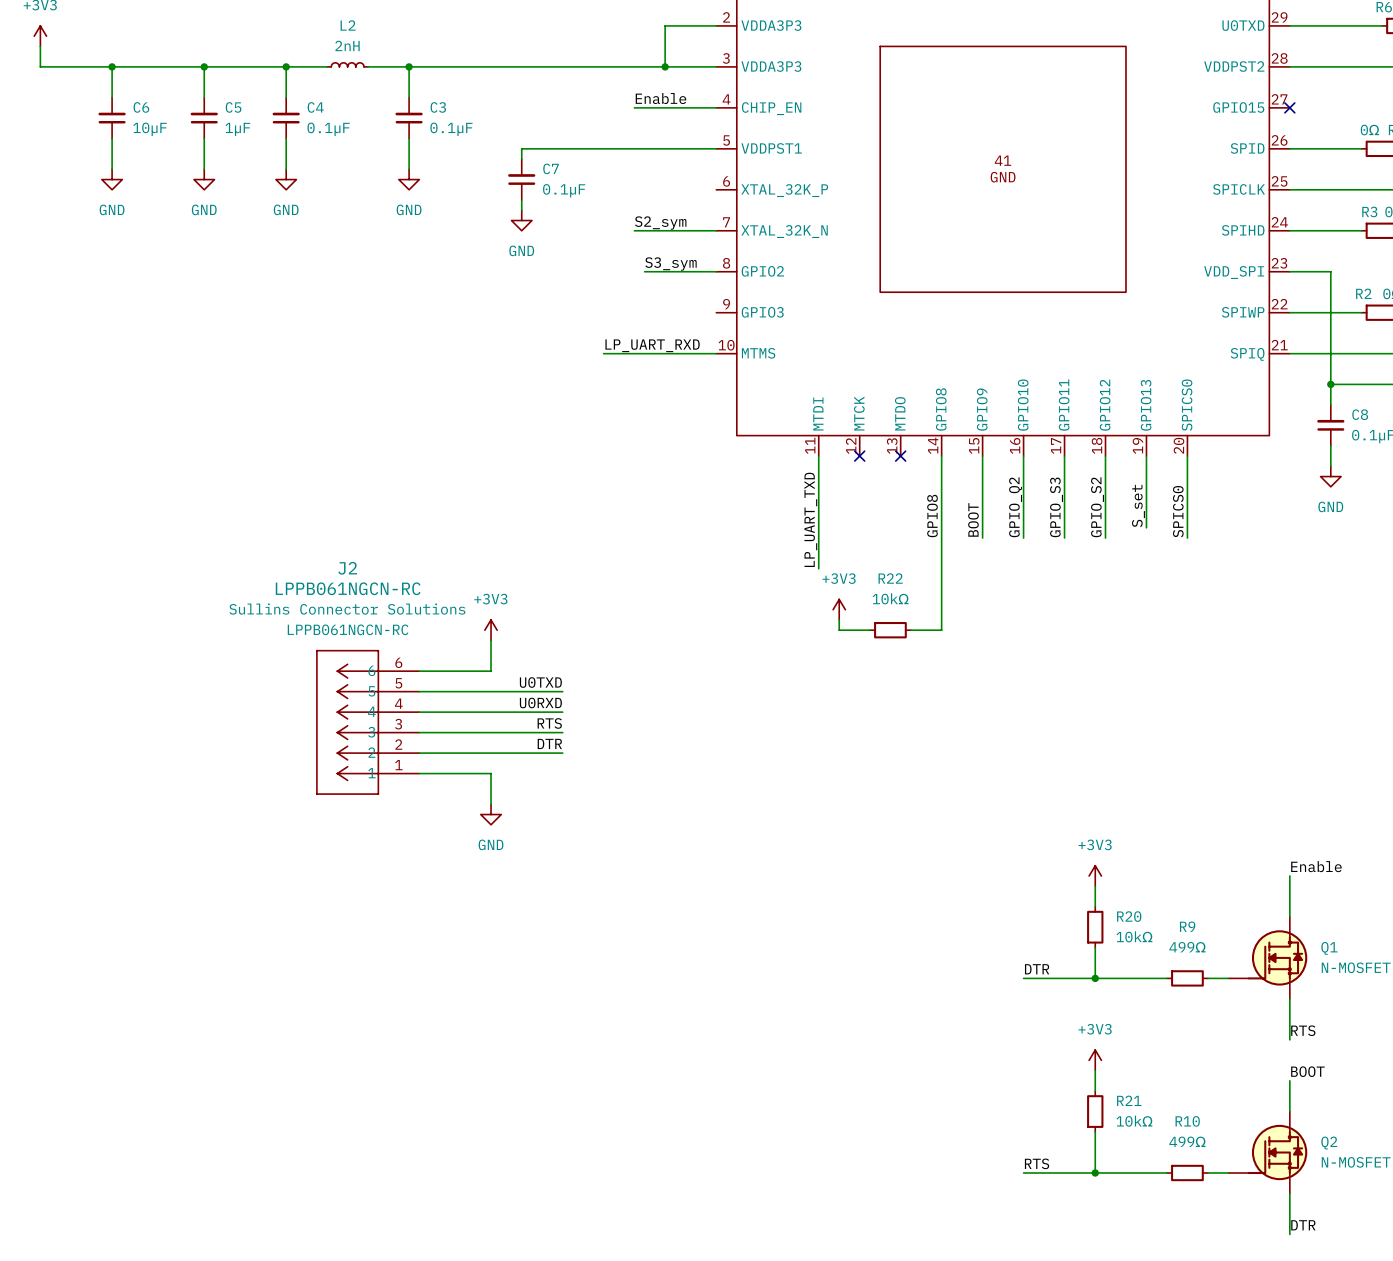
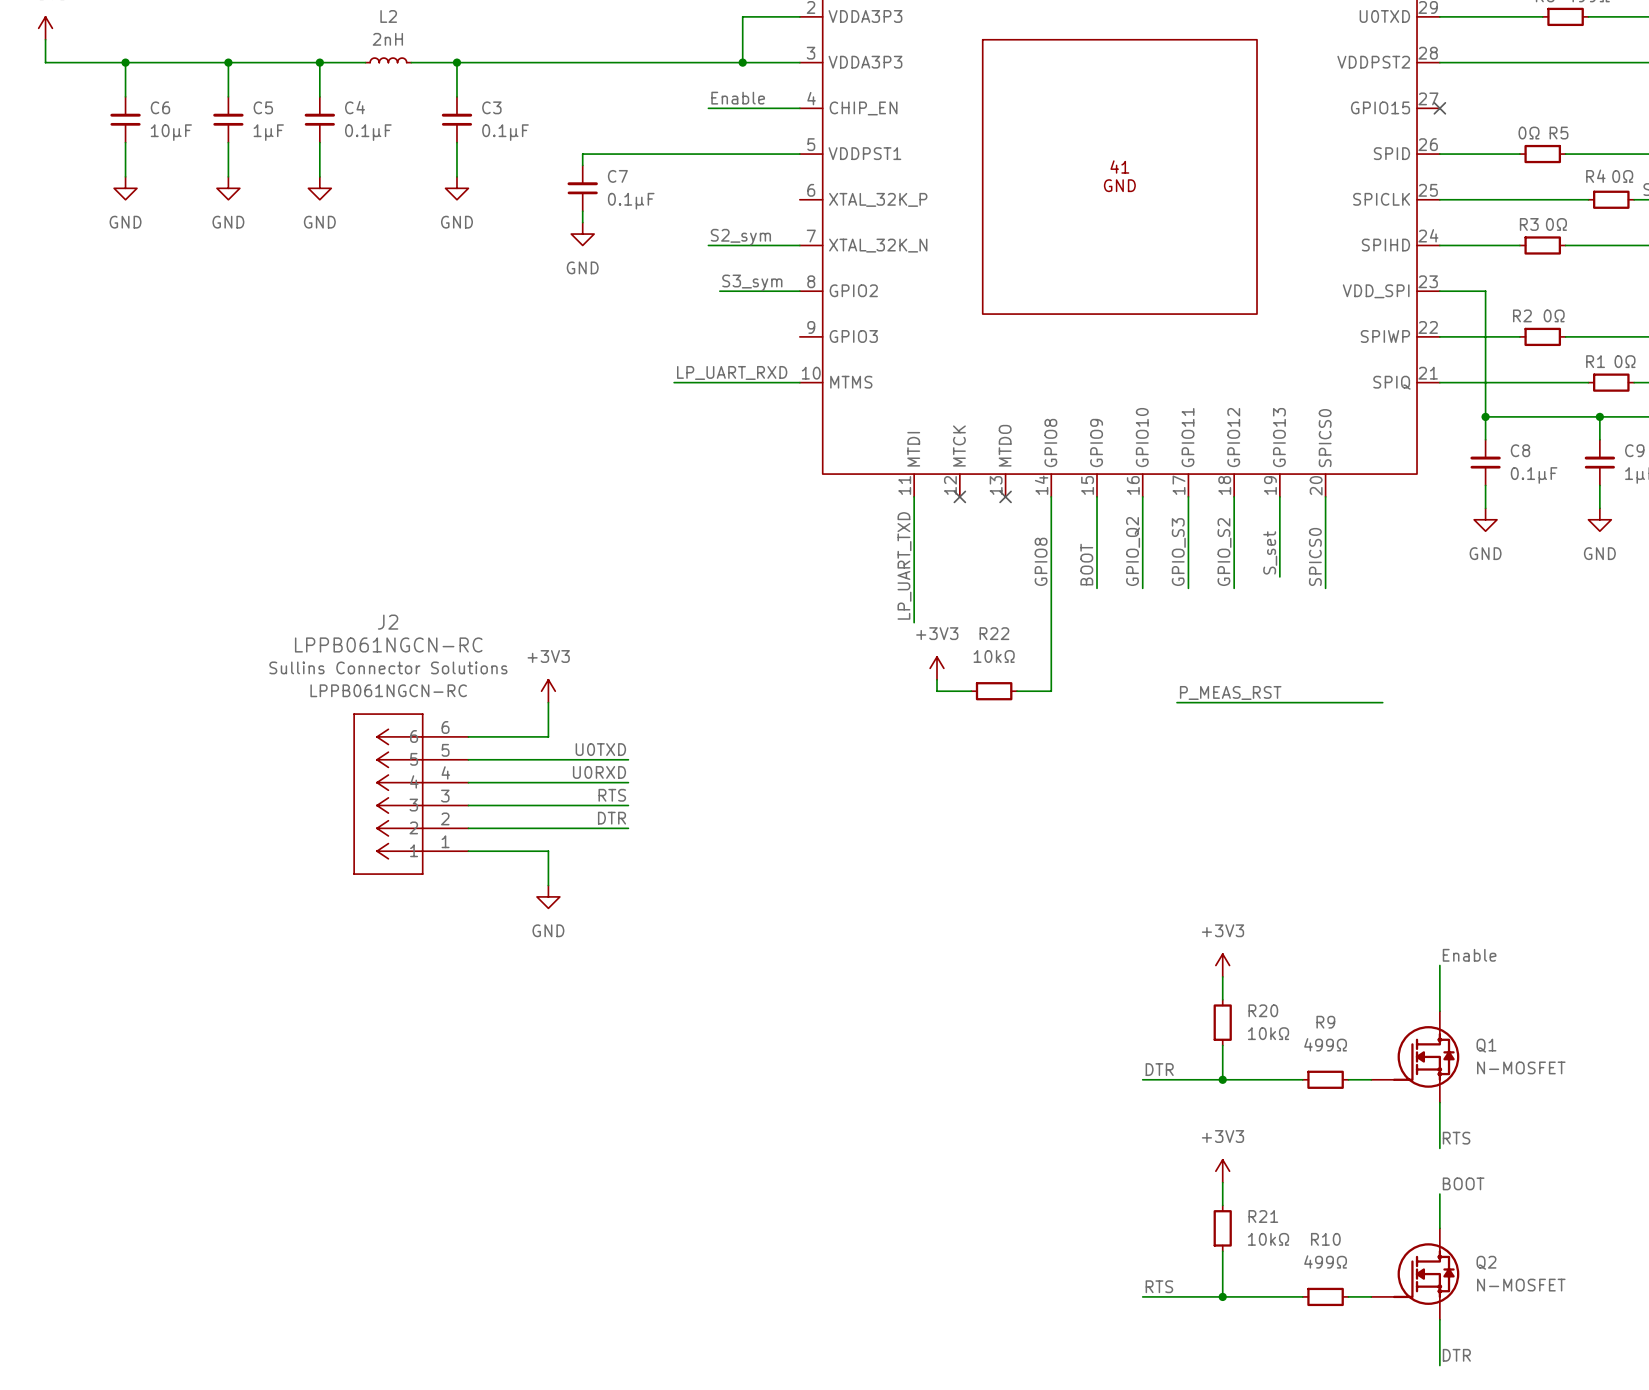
label: none -> P_MEAS_RST (1230, 692)
wire: none -> (1177, 702) (1382, 702)

